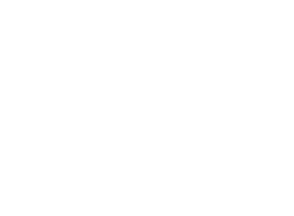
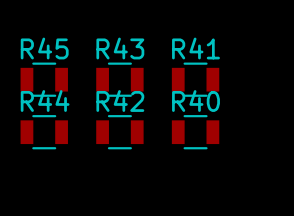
R45: none -> (44, 79)
R43: none -> (119, 79)
R41: none -> (195, 79)
R44: none -> (44, 132)
R42: none -> (119, 132)
R40: none -> (195, 132)

